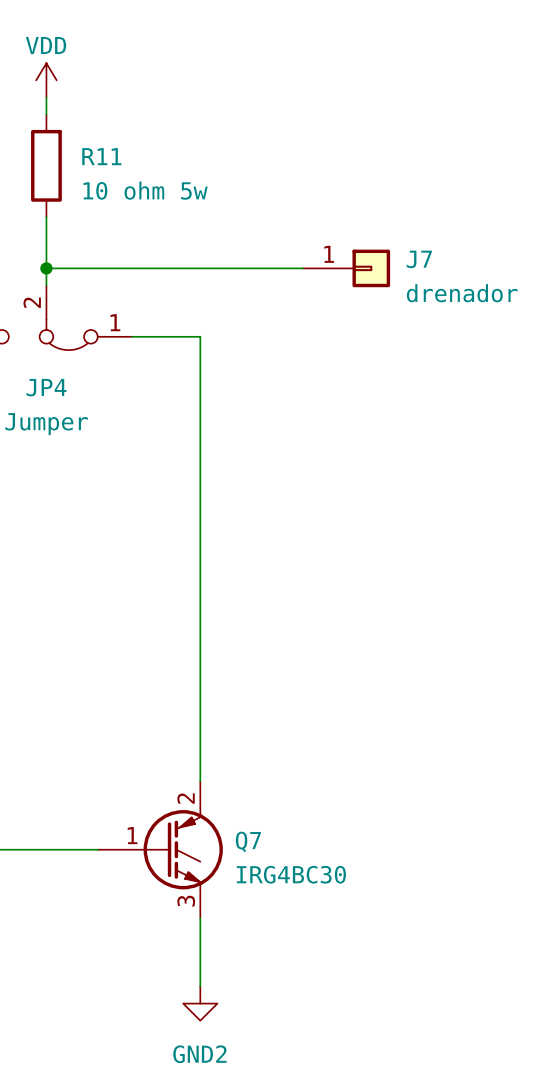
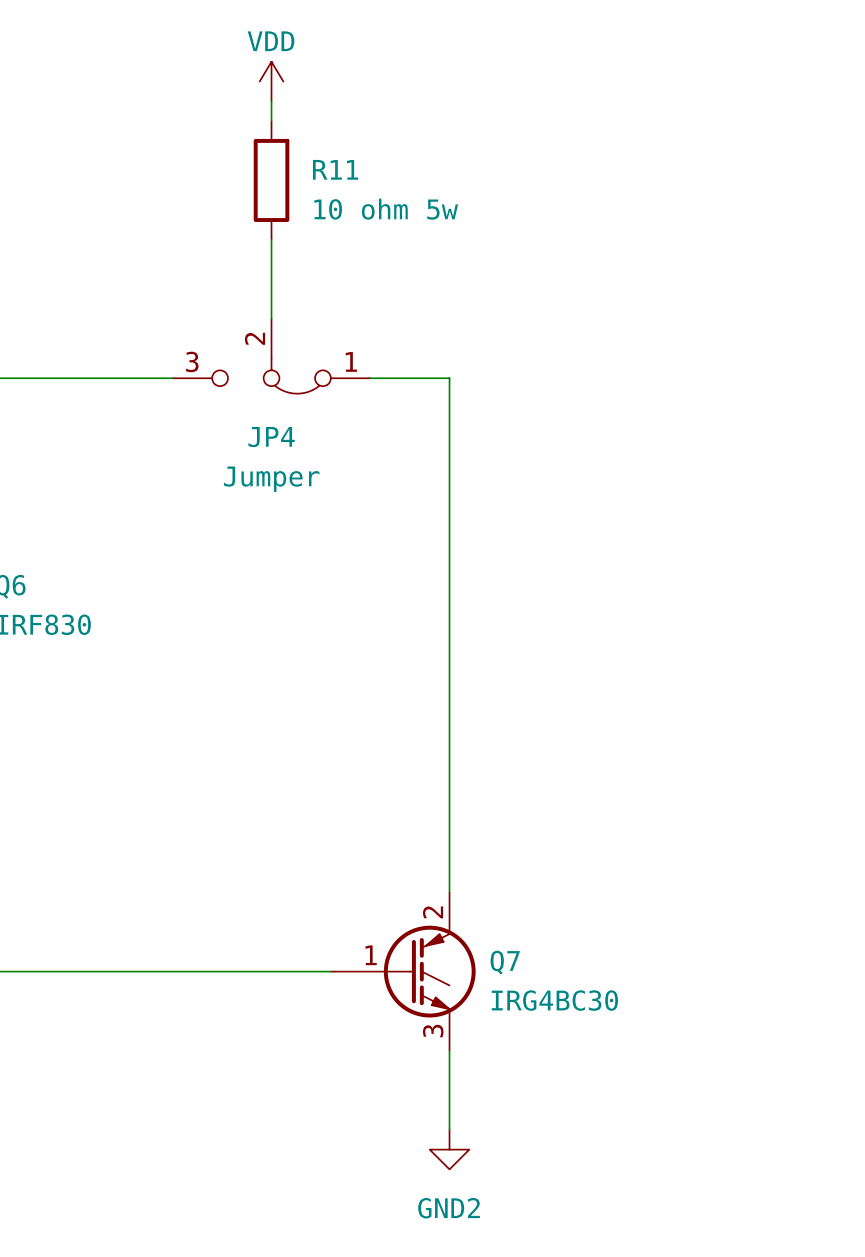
wire: (46, 268) (302, 268) -> none
junction: (46, 268) -> none
J7: drenador (346, 268) -> none

